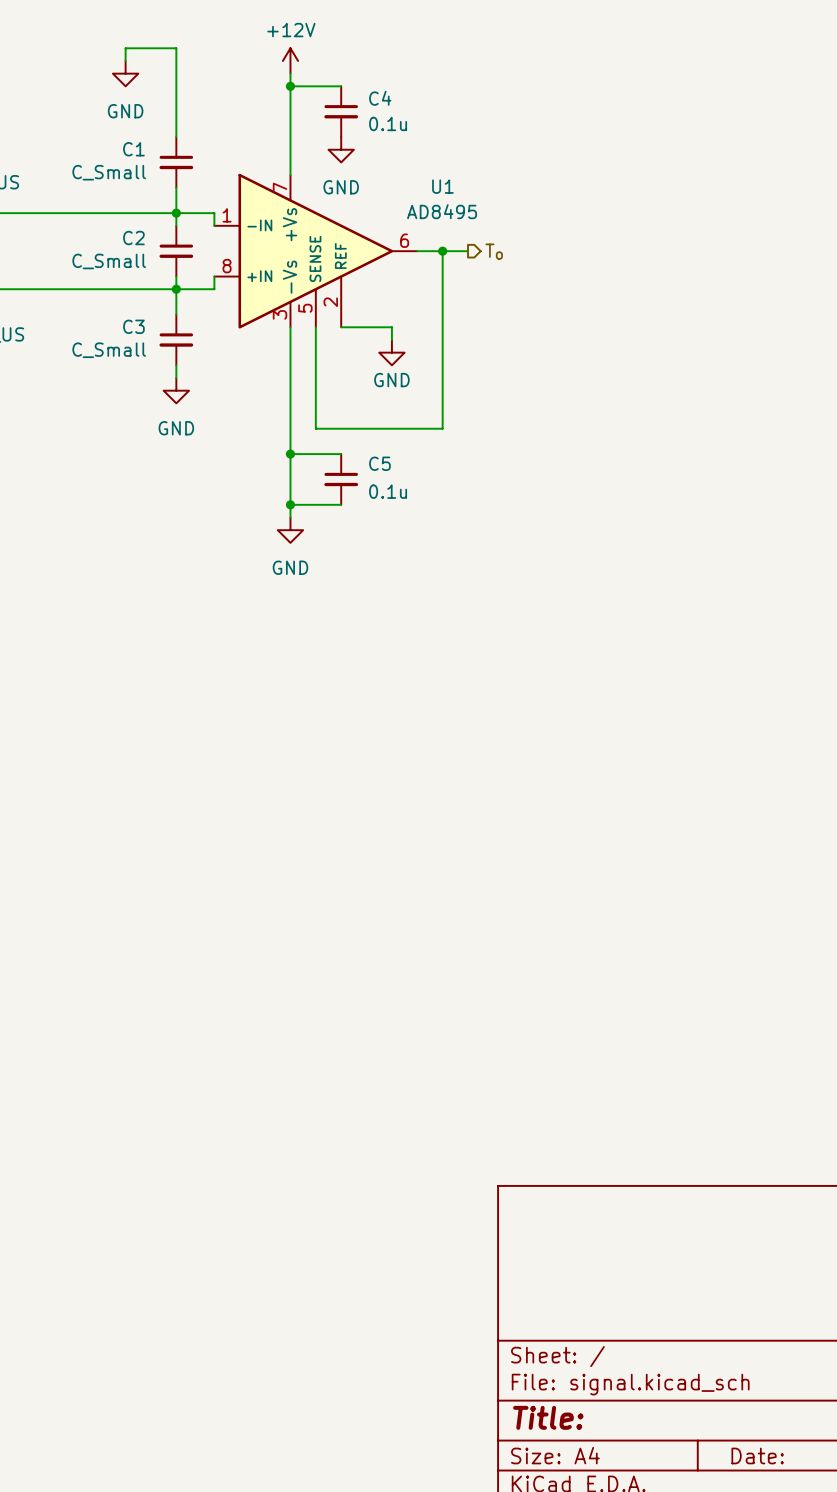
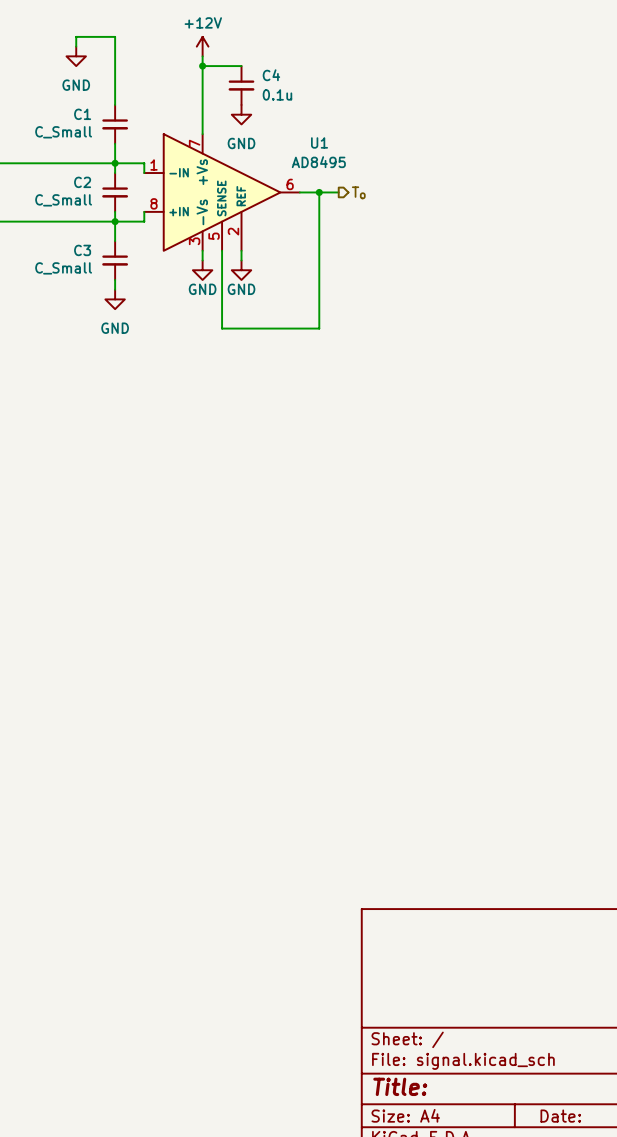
wire: (341, 327) (391, 327) (391, 339) -> (241, 250) (241, 260)
wire: (290, 339) (290, 517) -> none
power symbol: none -> GND (202, 270)
power symbol: none -> GND (241, 270)
power symbol: GND (391, 352) -> none
wire: (290, 454) (341, 454) -> none
junction: (290, 454) -> none
C5: 0.1u (341, 479) -> none
wire: (290, 504) (341, 504) -> none
junction: (290, 504) -> none
power symbol: GND (290, 530) -> none

